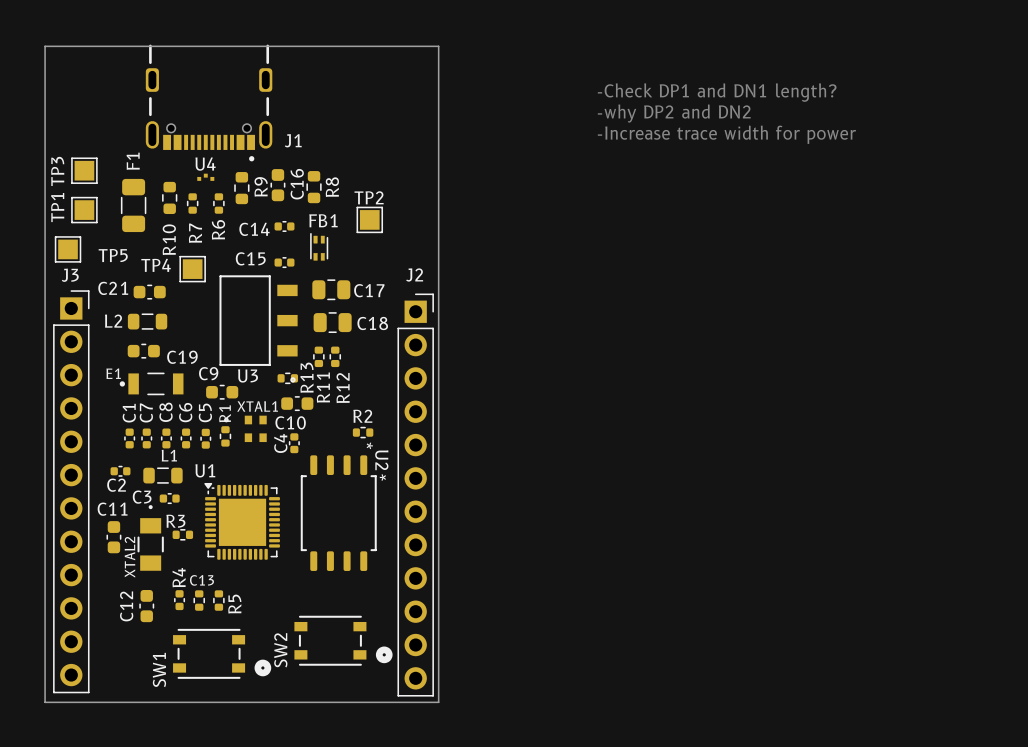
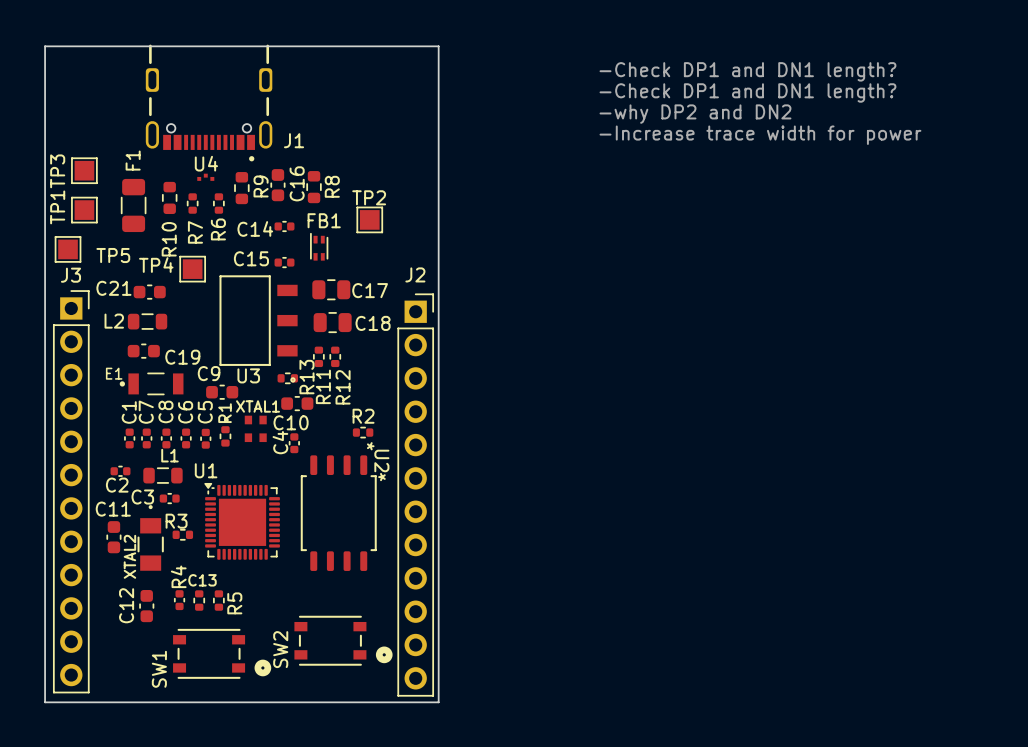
text: none -> -Check DP1 and DN1 length? (747, 71)

